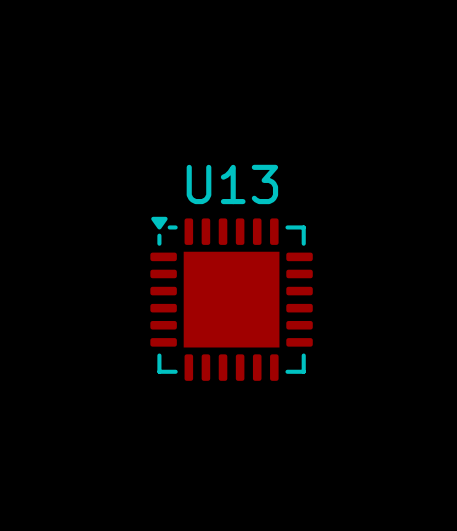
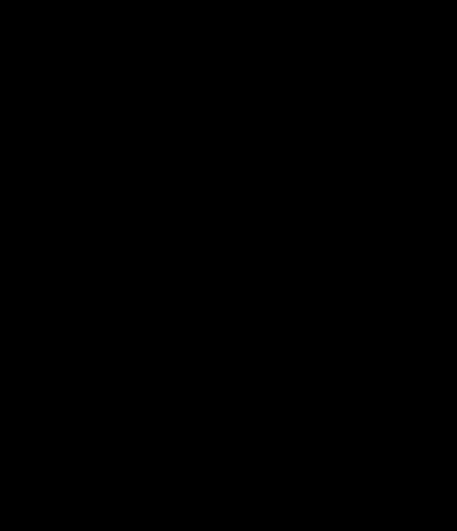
U13: (231, 298) -> none

